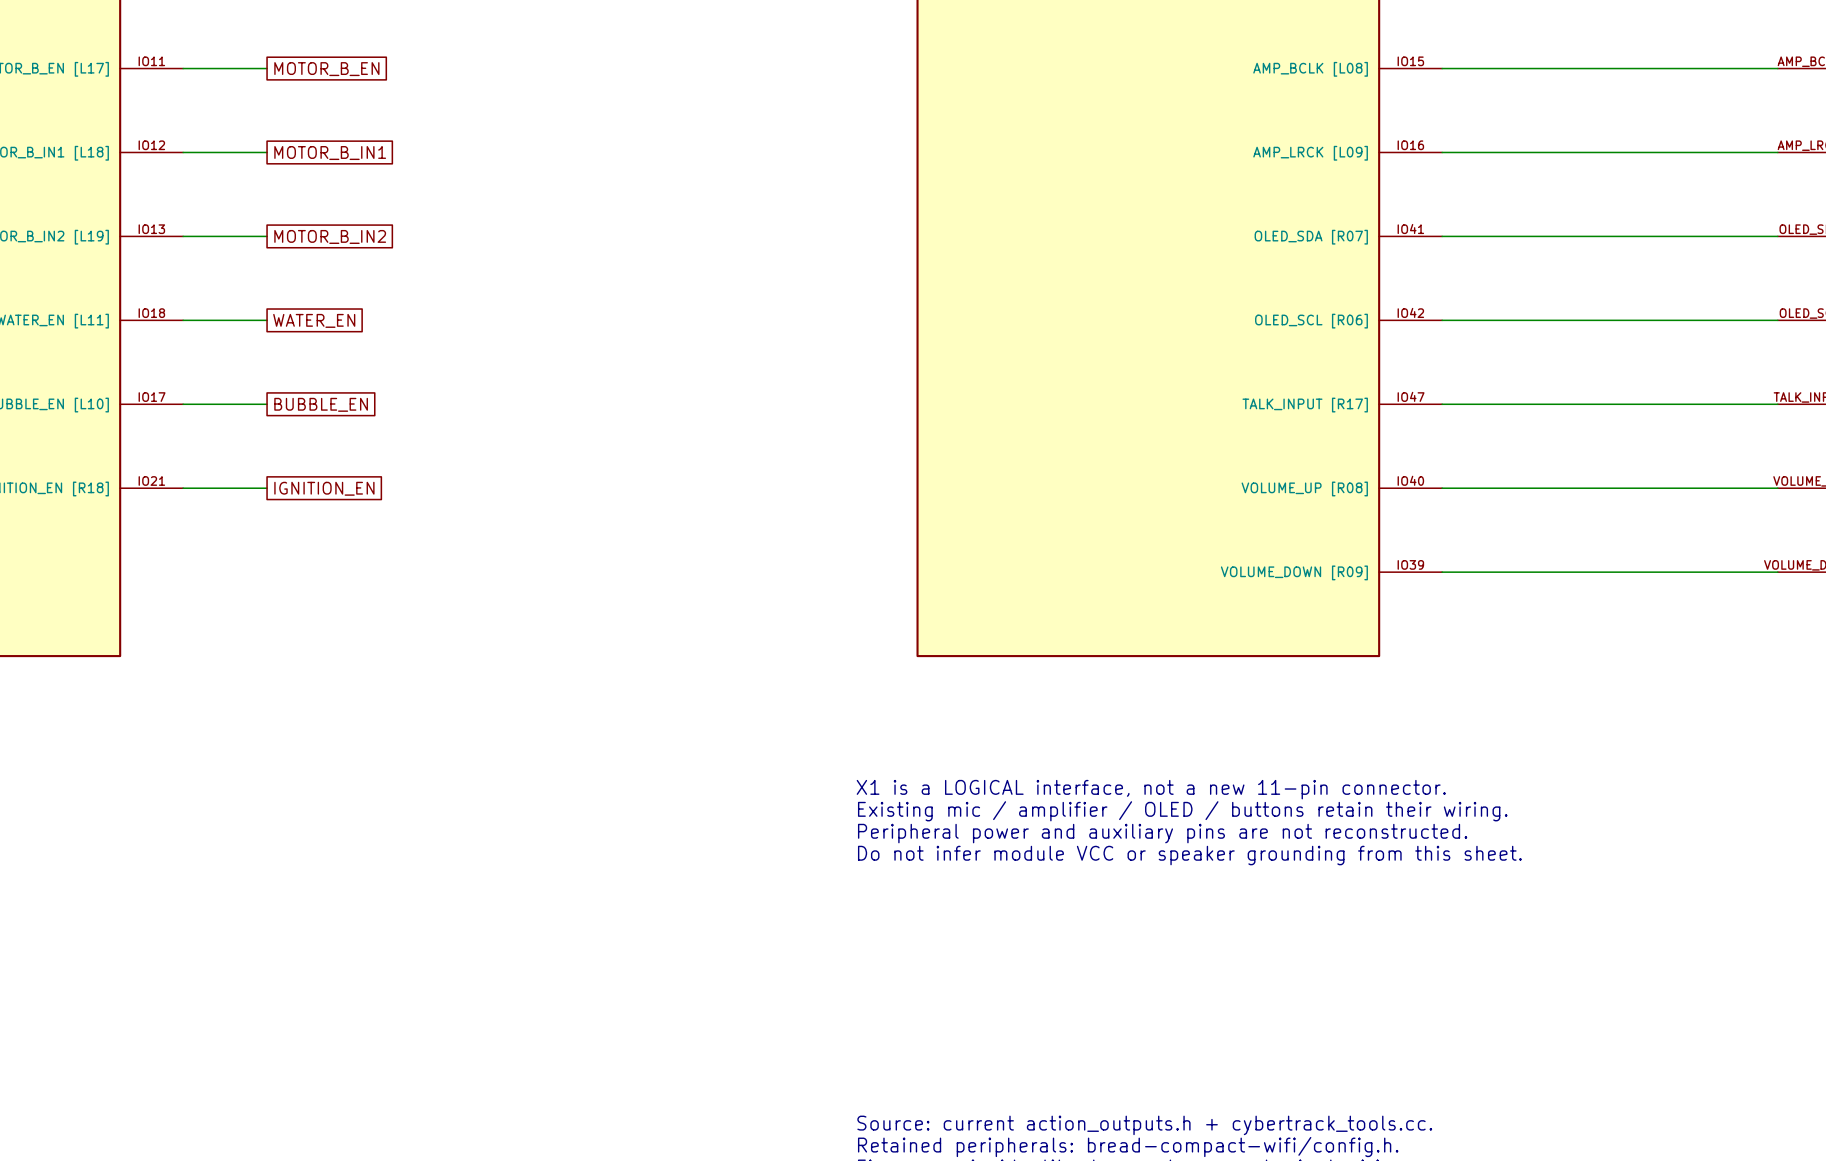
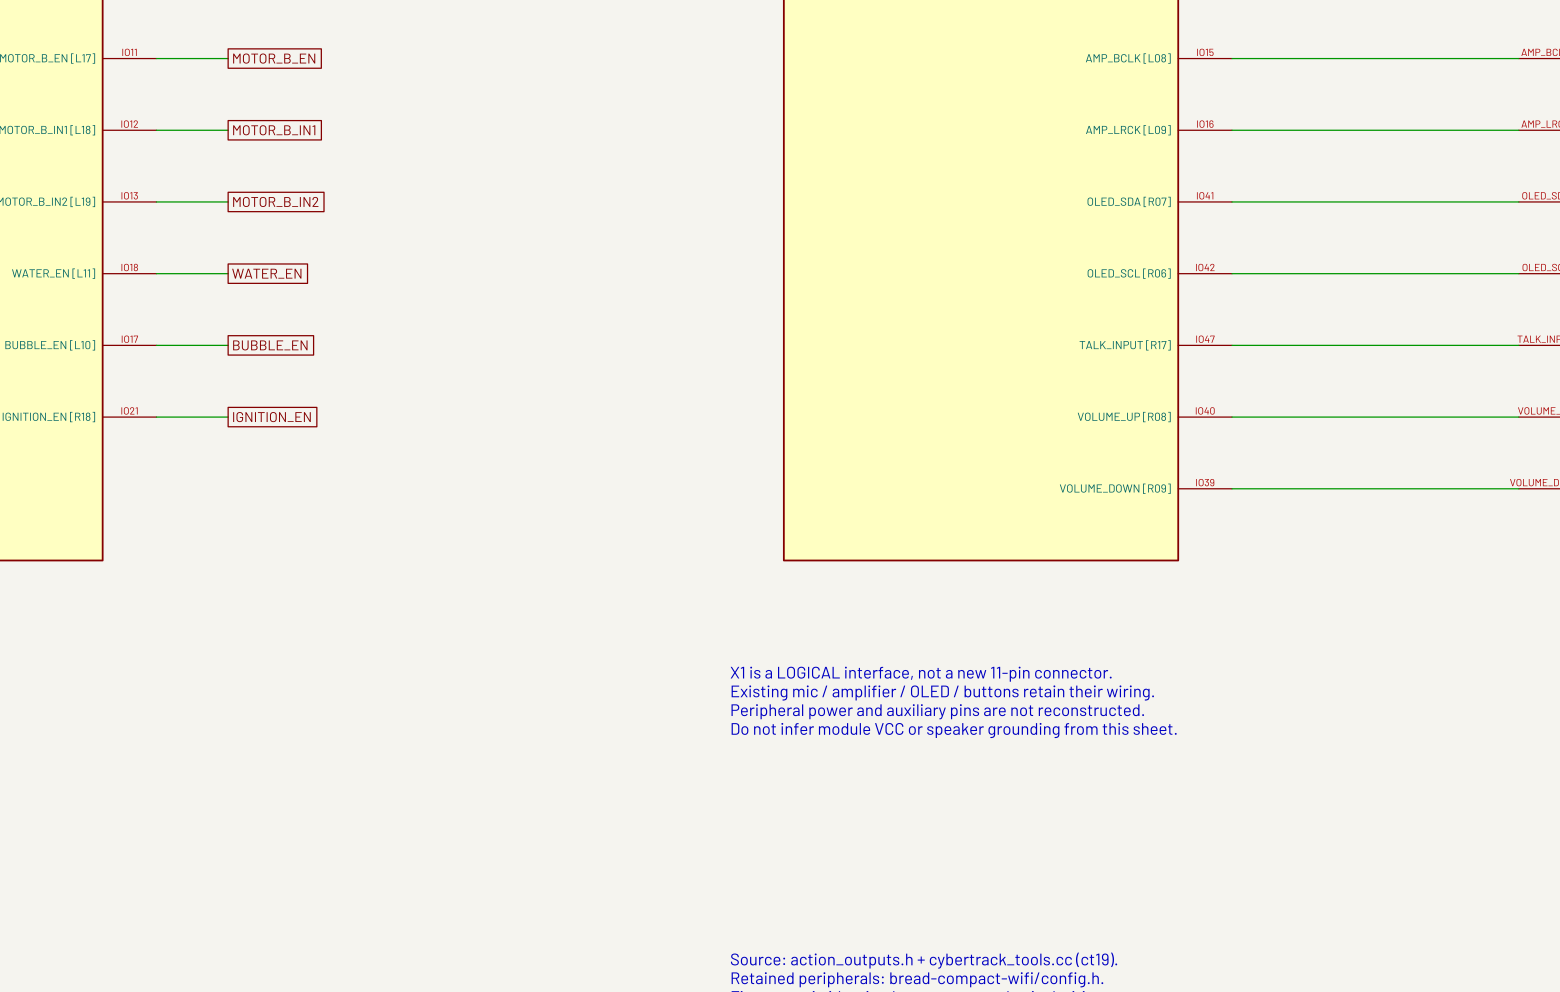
text: Source: current action_outputs.h + cybertrack_tools.cc. (1144, 1125) -> Source: action_outputs.h + cybertrack_tools.cc (ct19). (924, 960)

